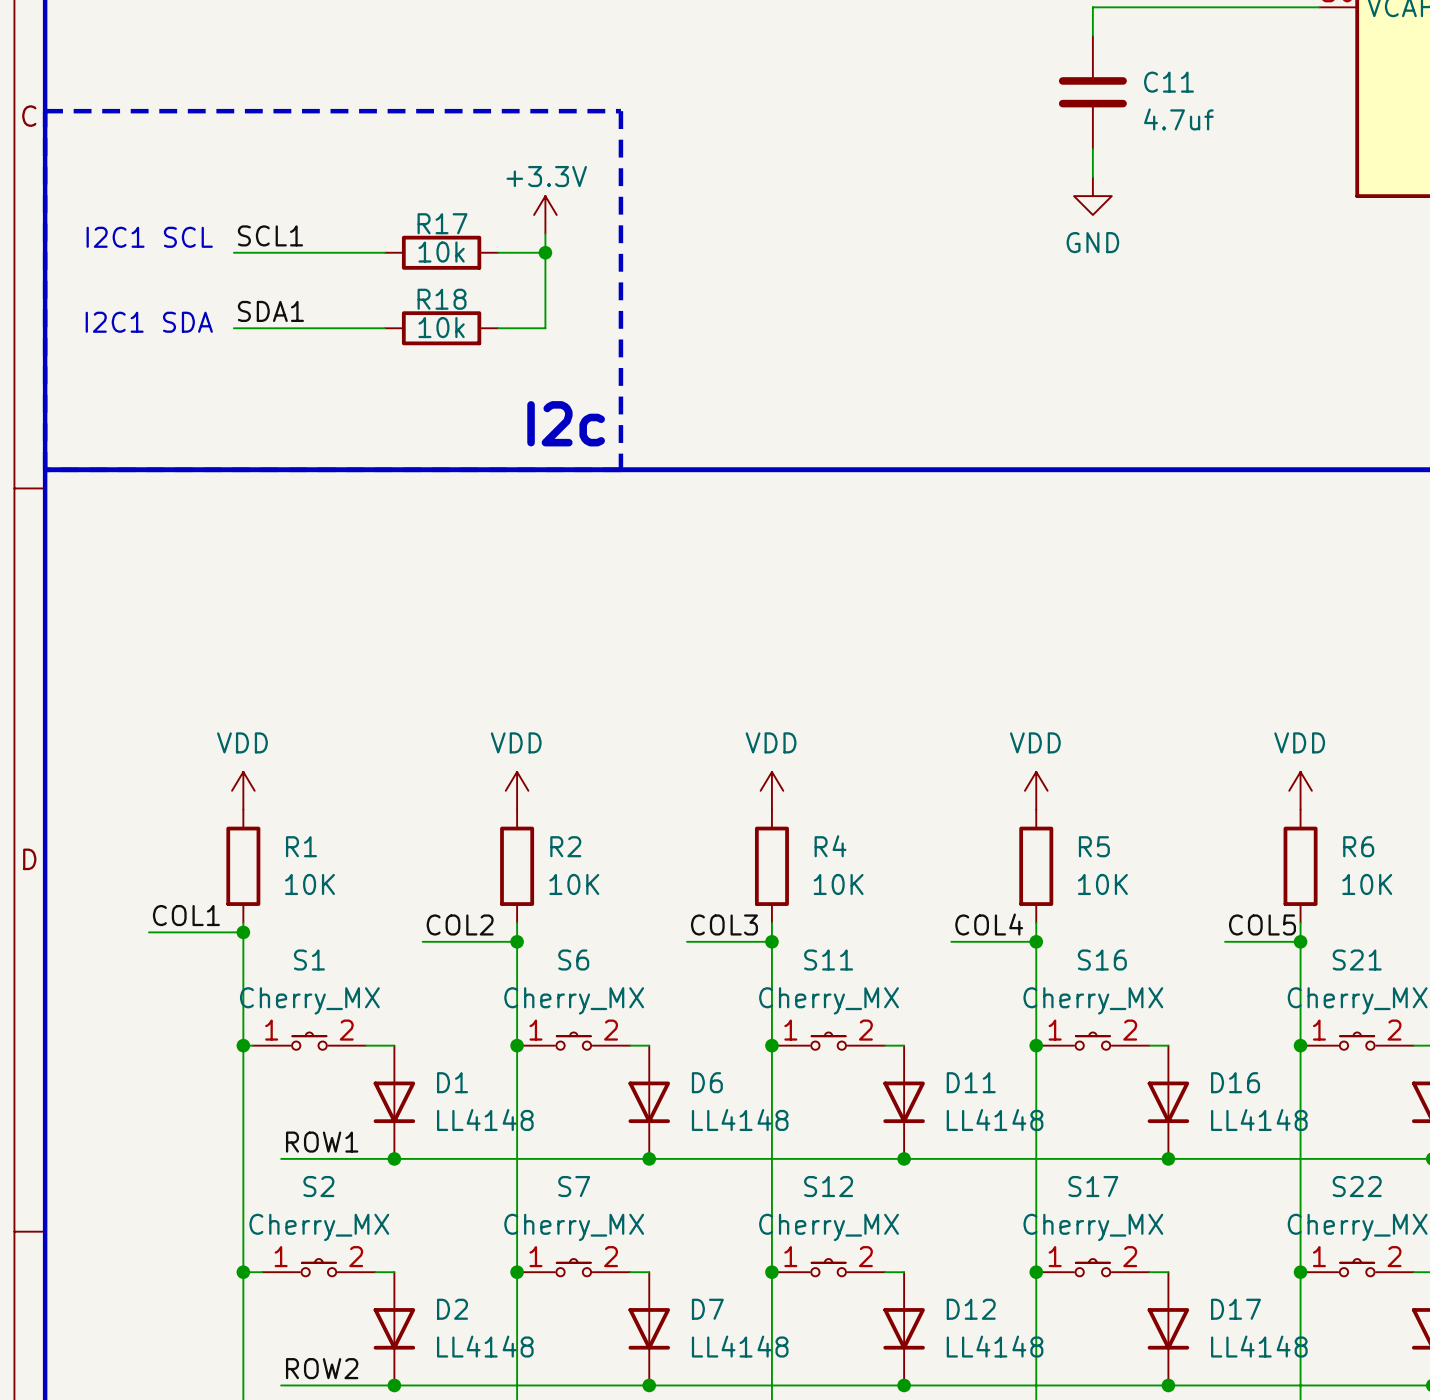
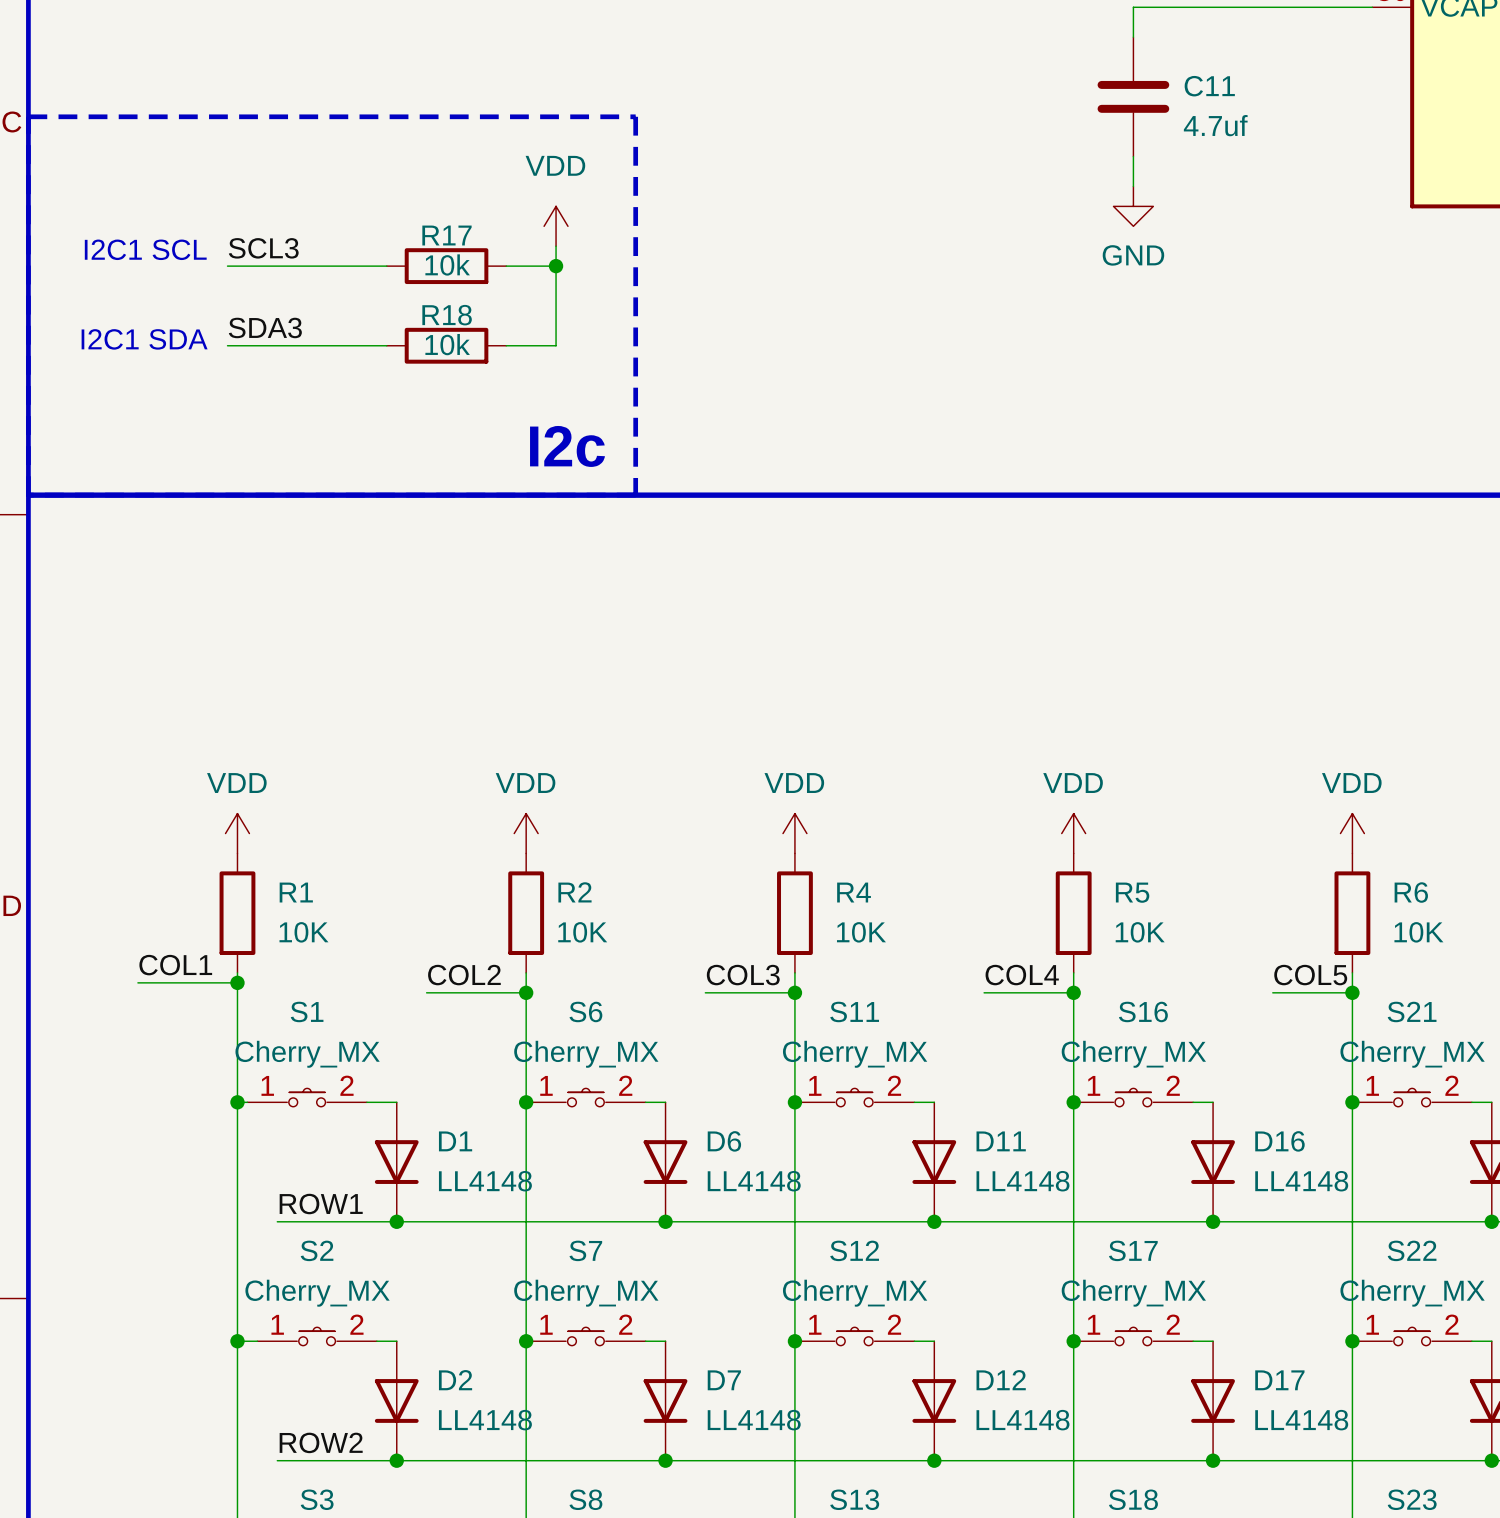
power symbol: +3.3V (545, 214) -> VDD (556, 226)
label: SCL1 (270, 235) -> SCL3 (263, 248)
label: SDA1 (270, 311) -> SDA3 (265, 327)

